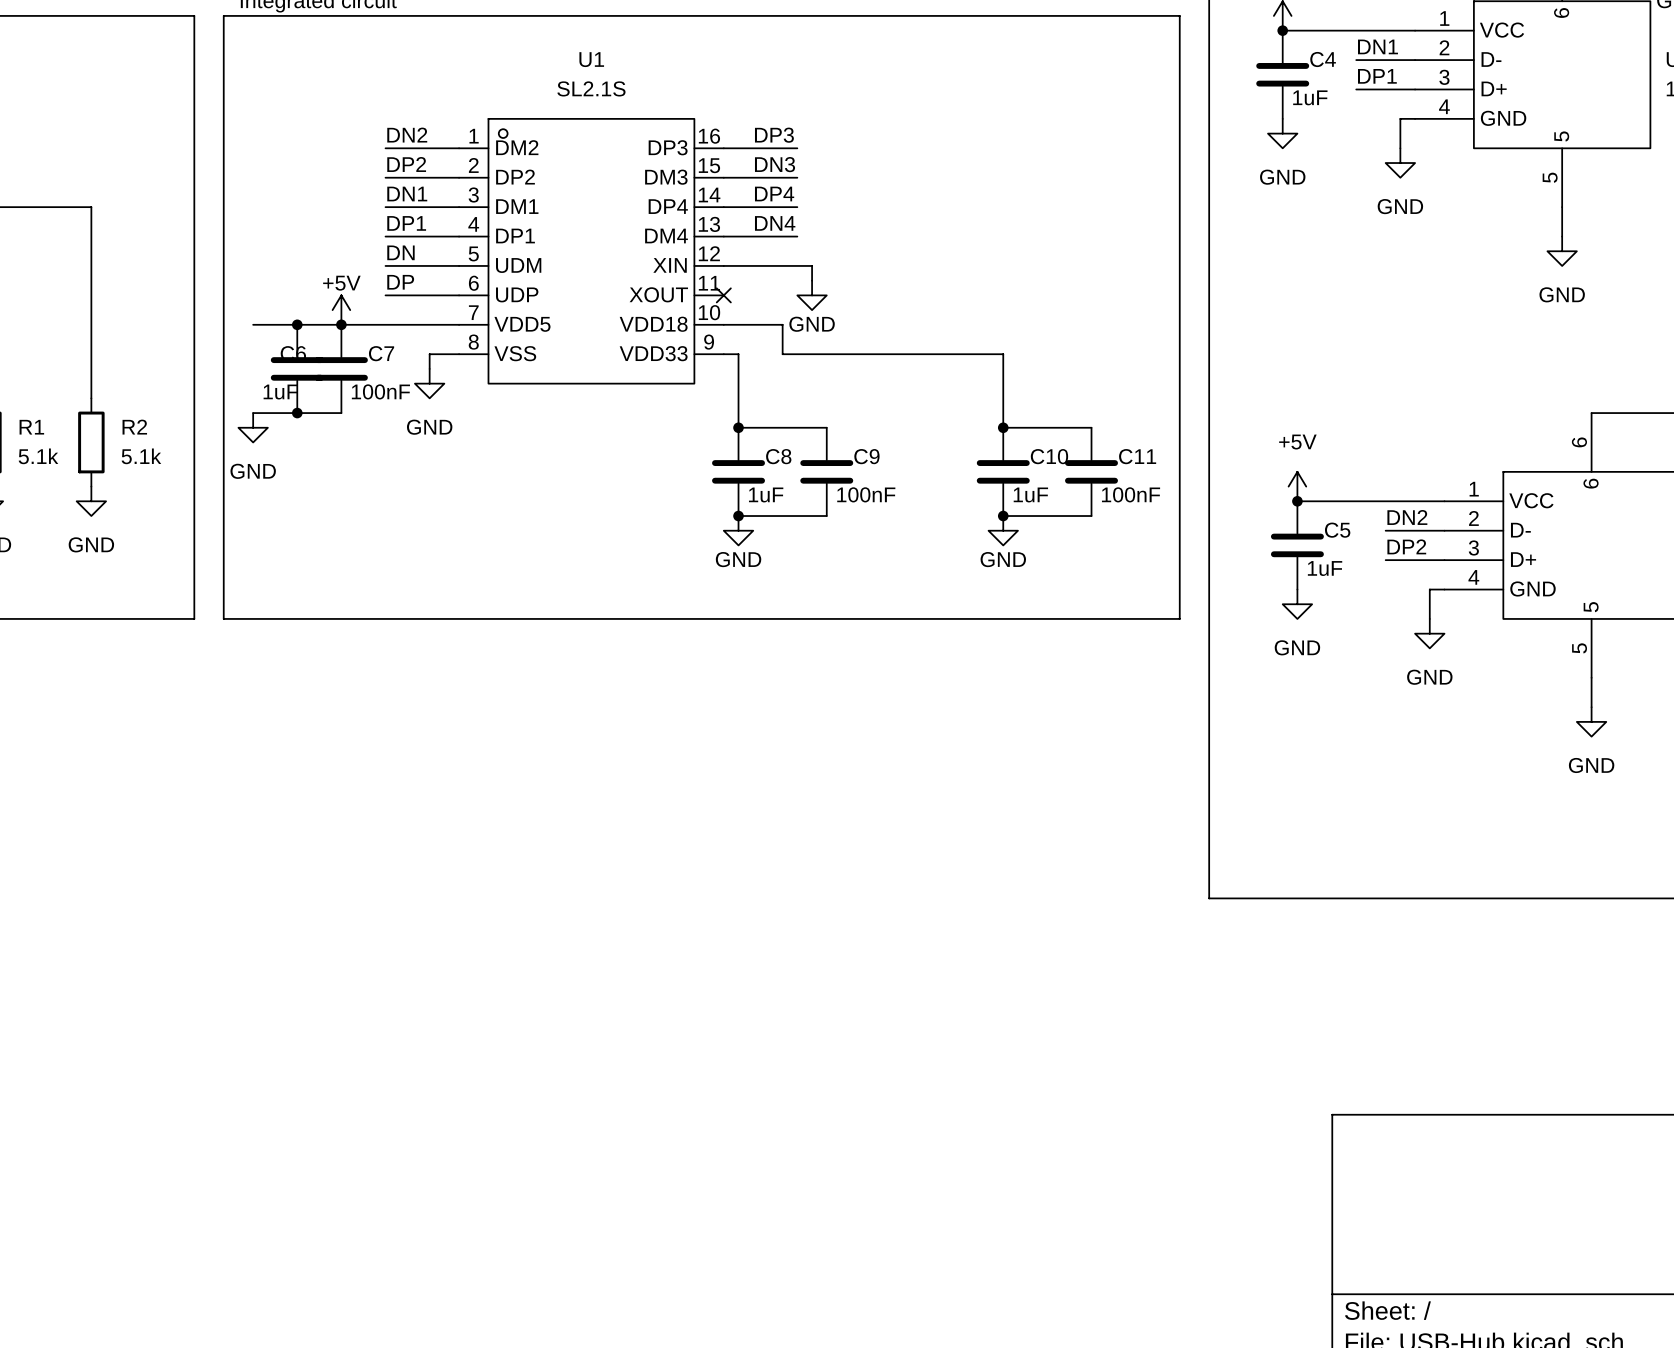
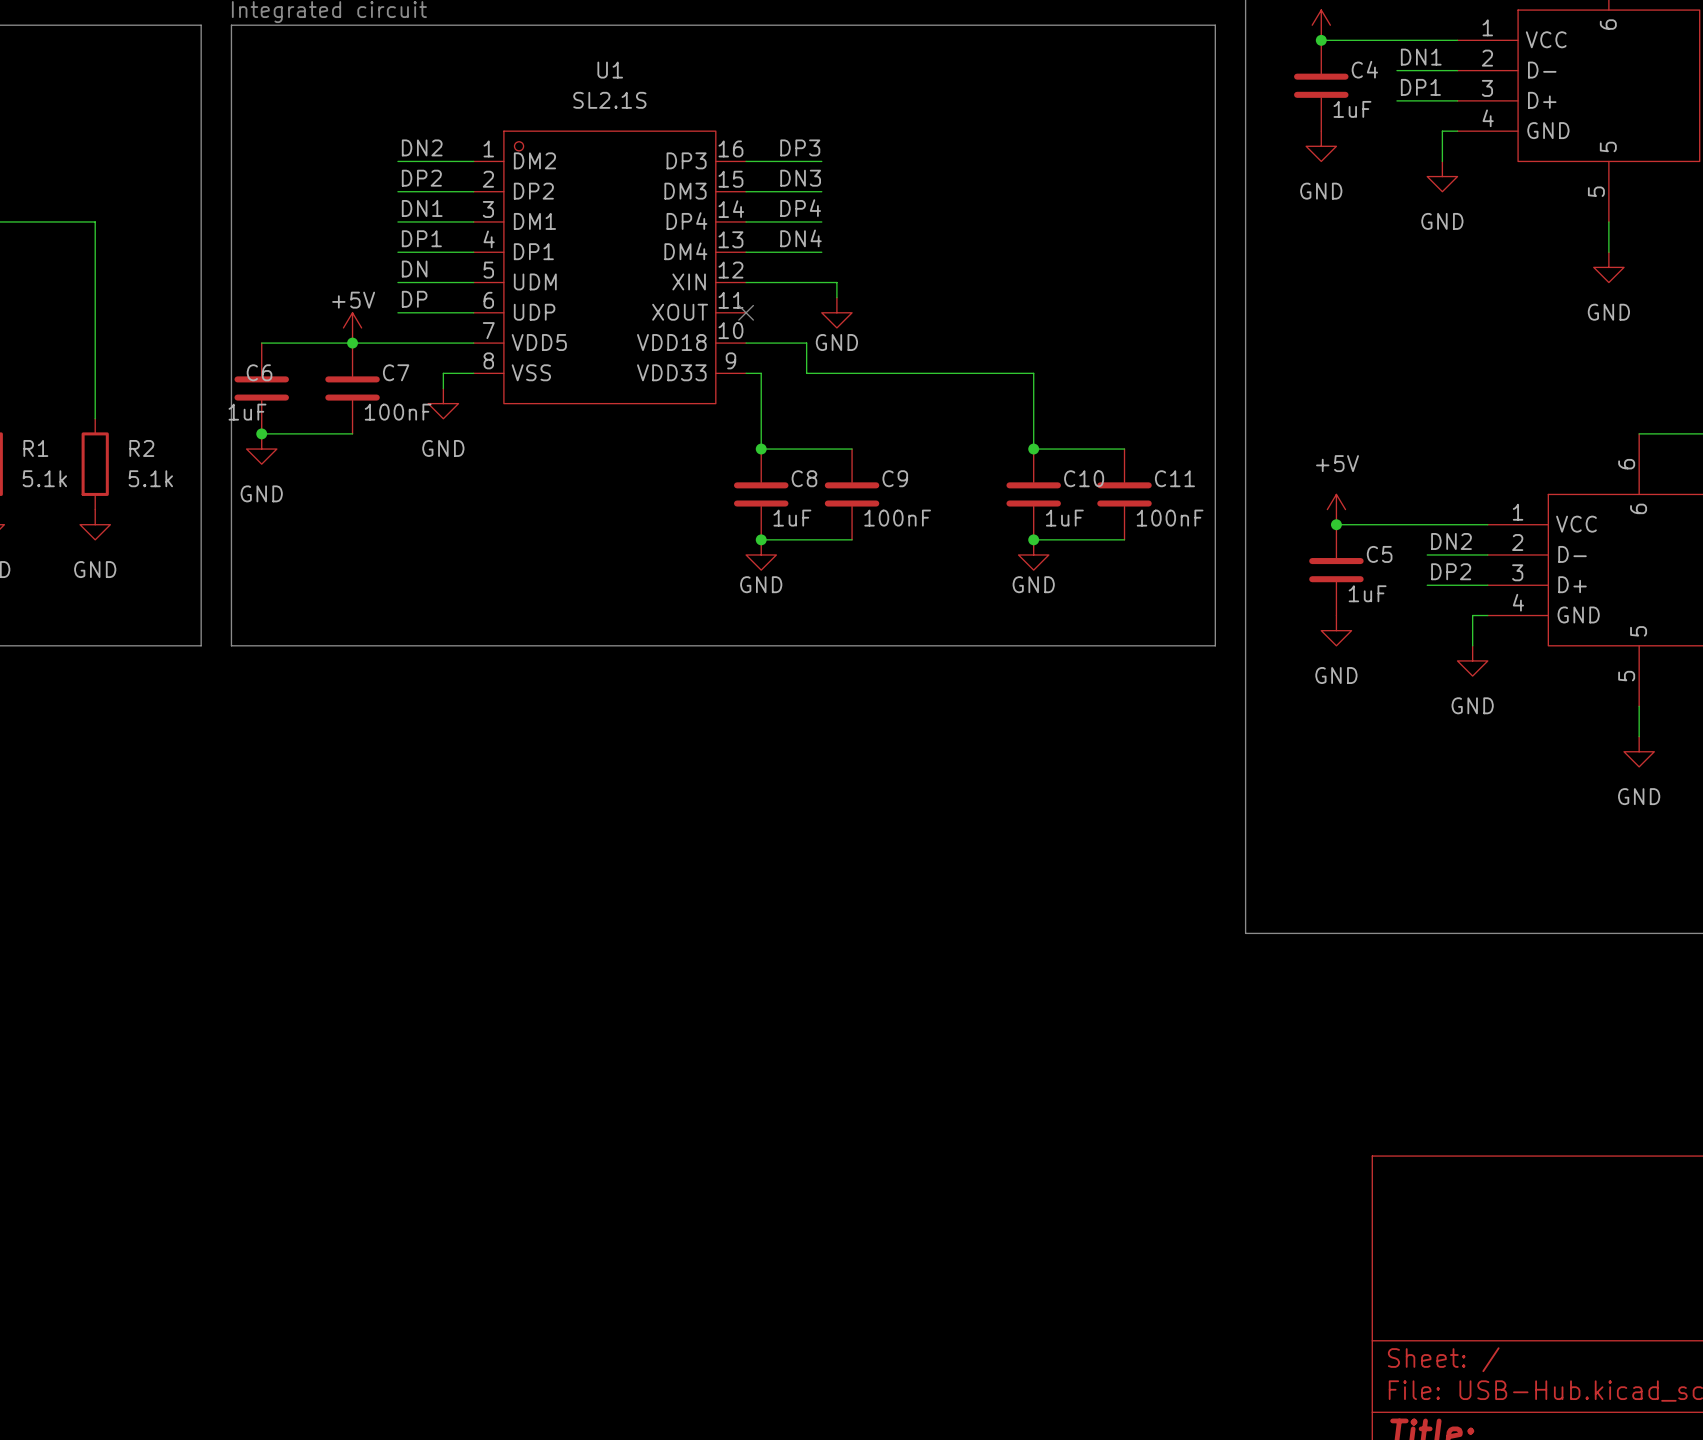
junction: (297, 324) -> none
C6 position: (297, 368) -> (261, 388)
junction position: (297, 413) -> (261, 433)

